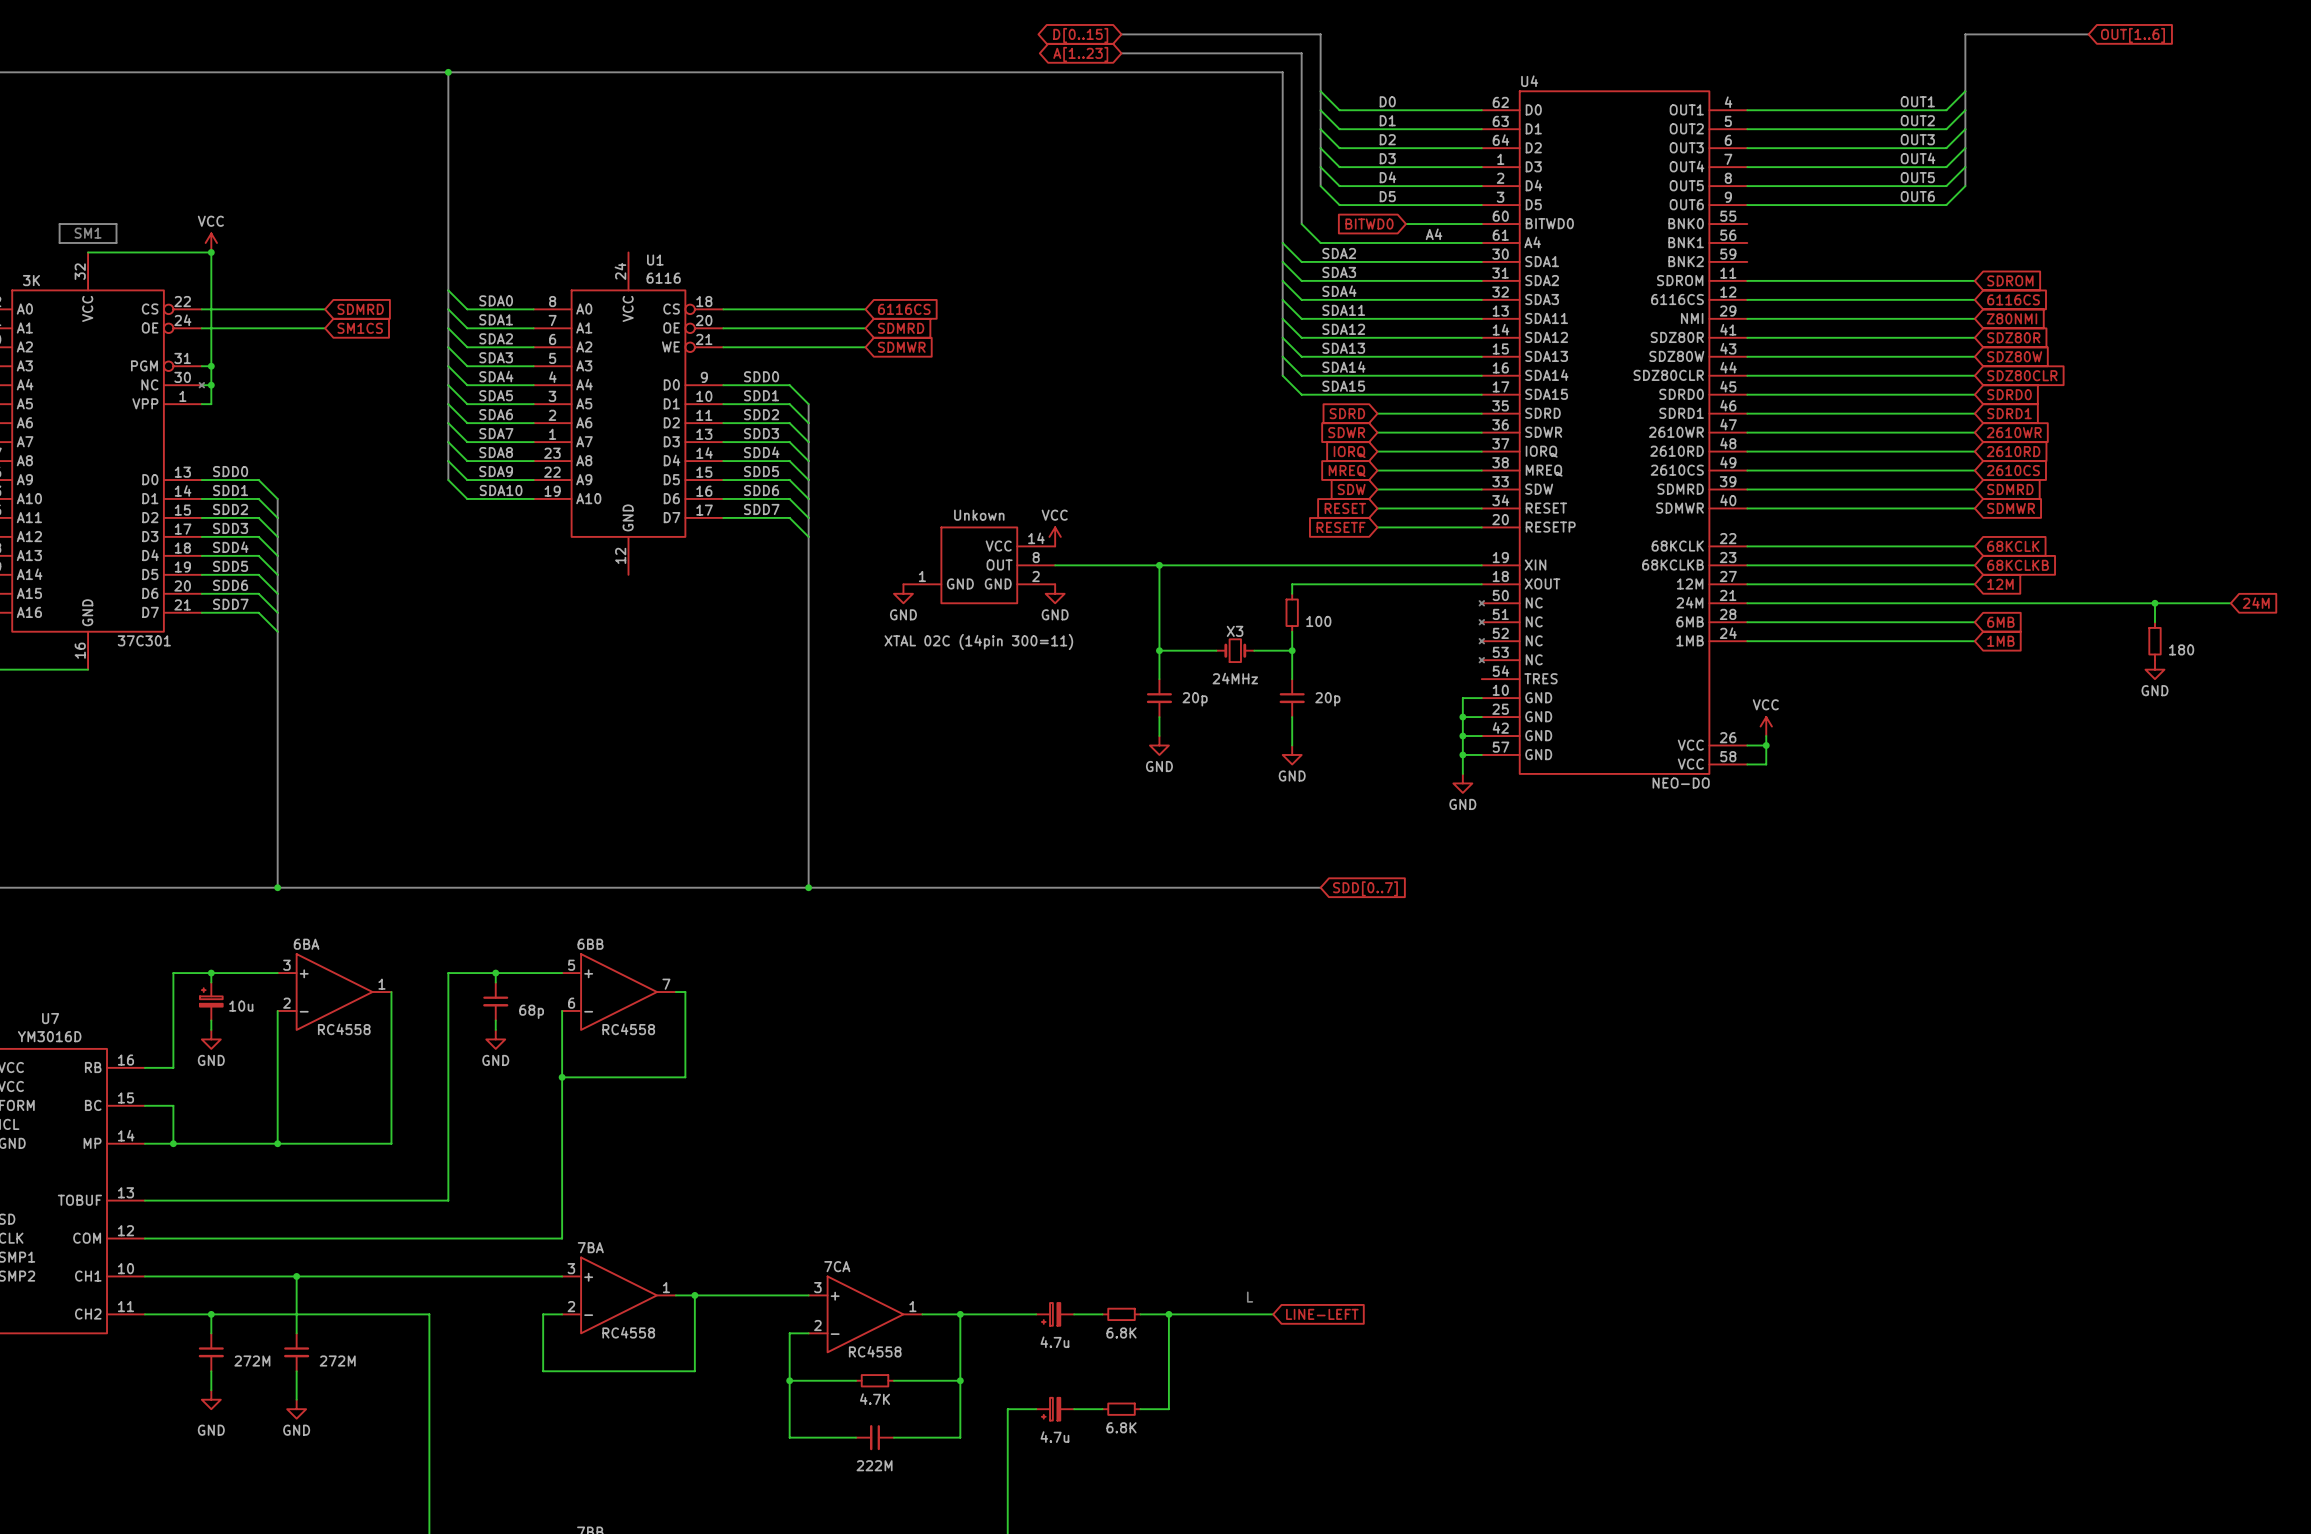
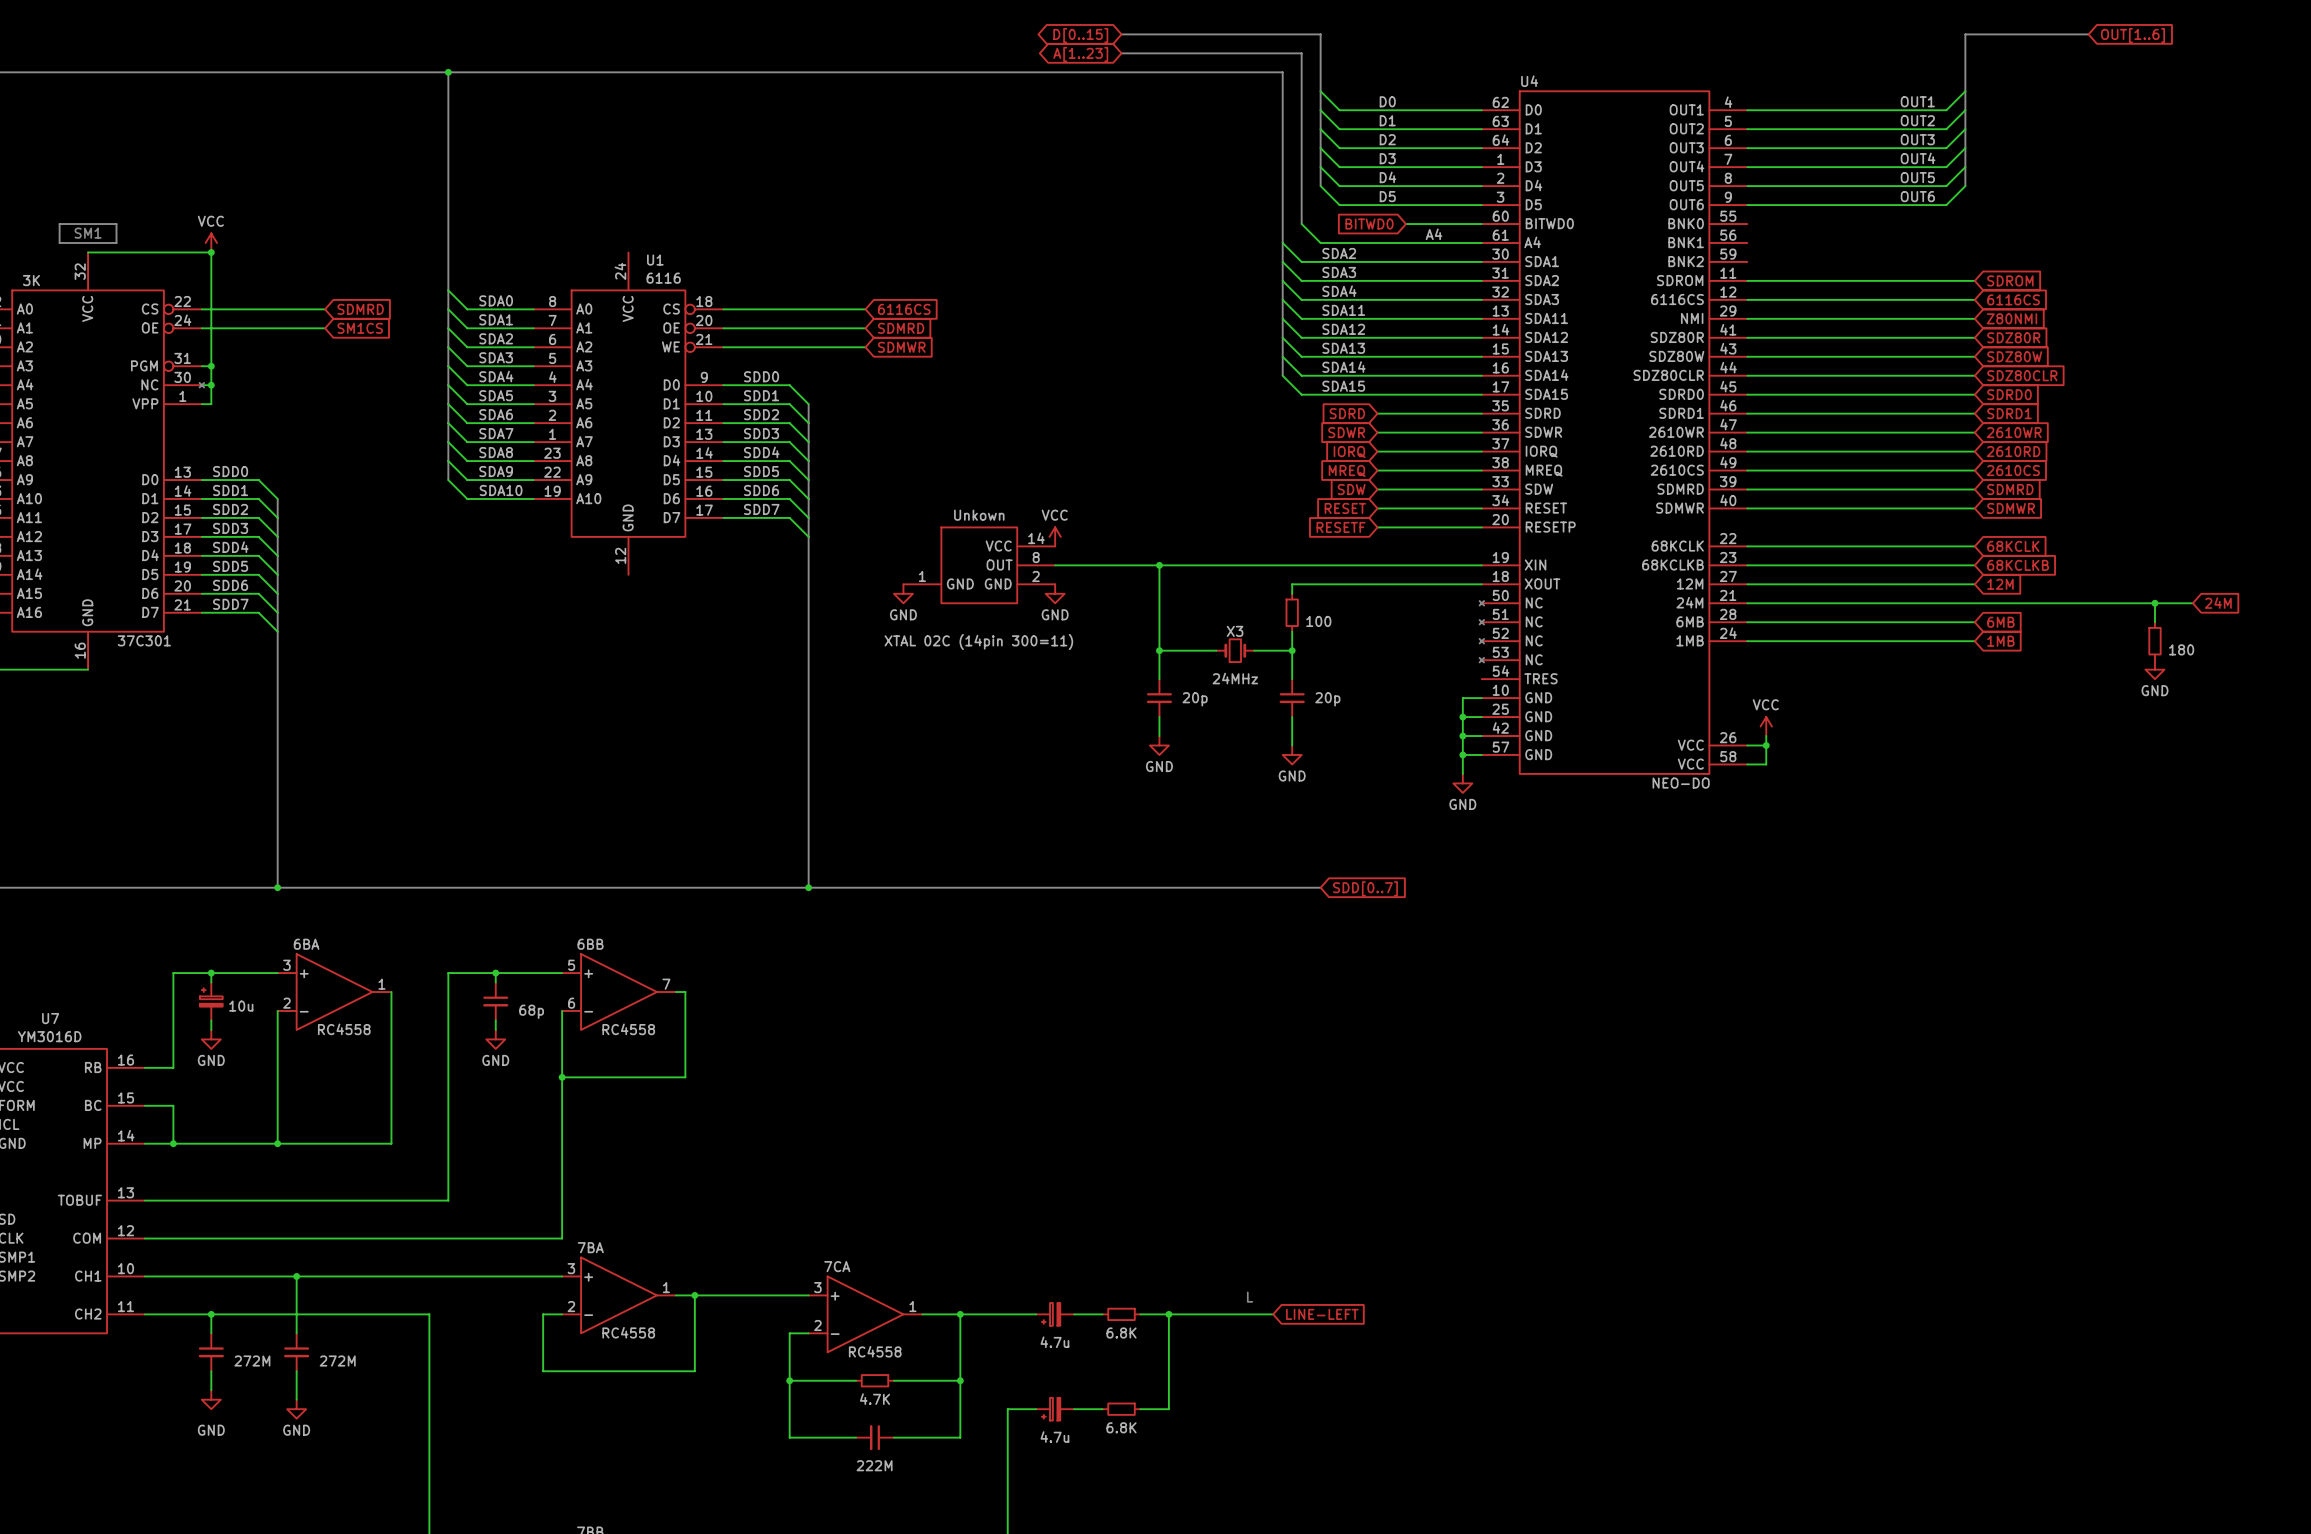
wire: (2192, 603) (2230, 603) -> none
global label position: 24M (2256, 603) -> 24M (2218, 603)

